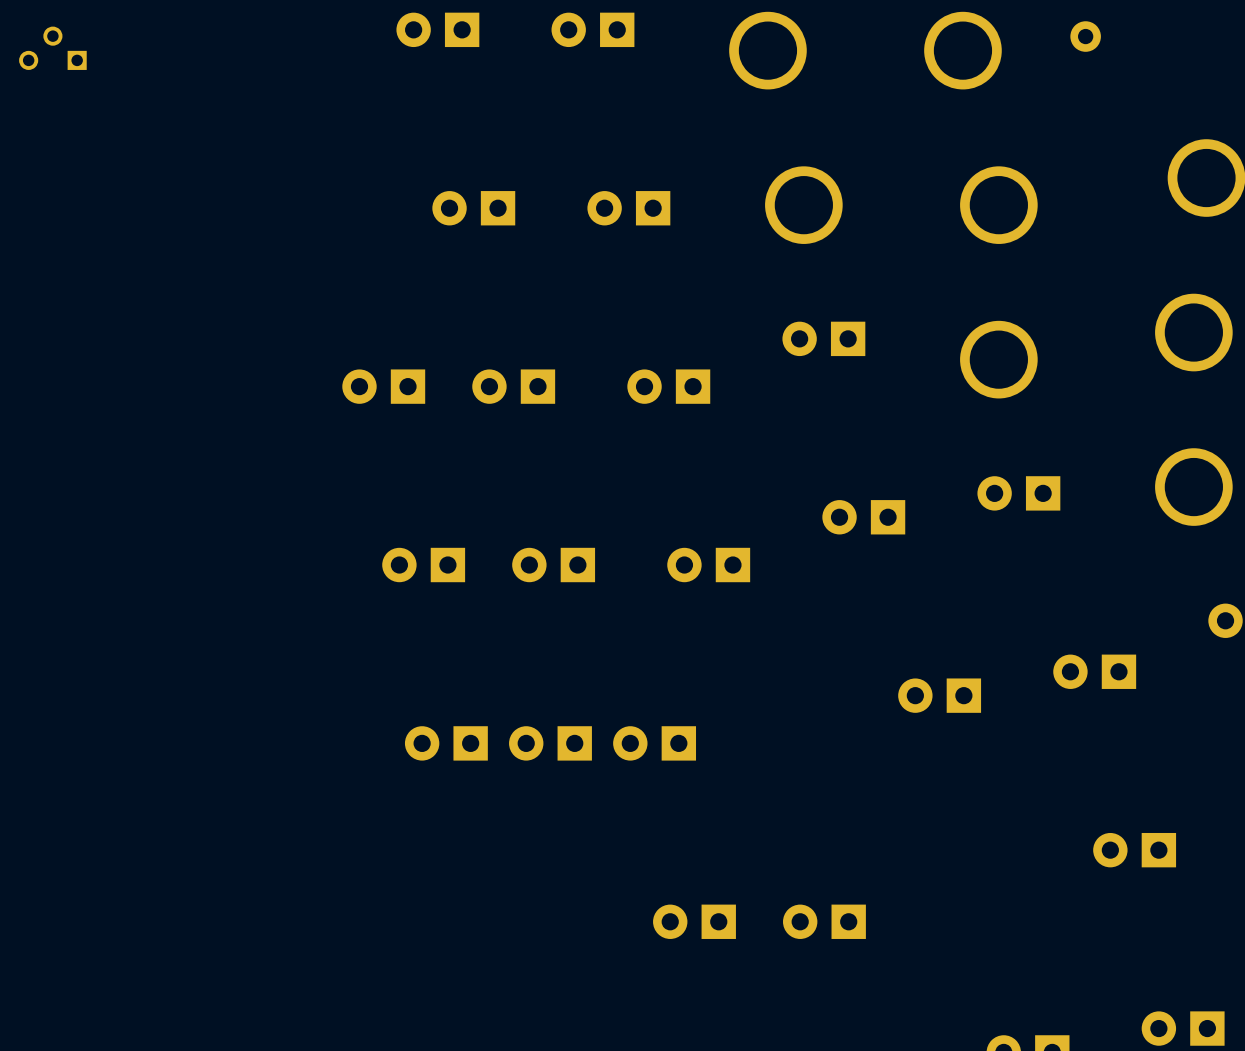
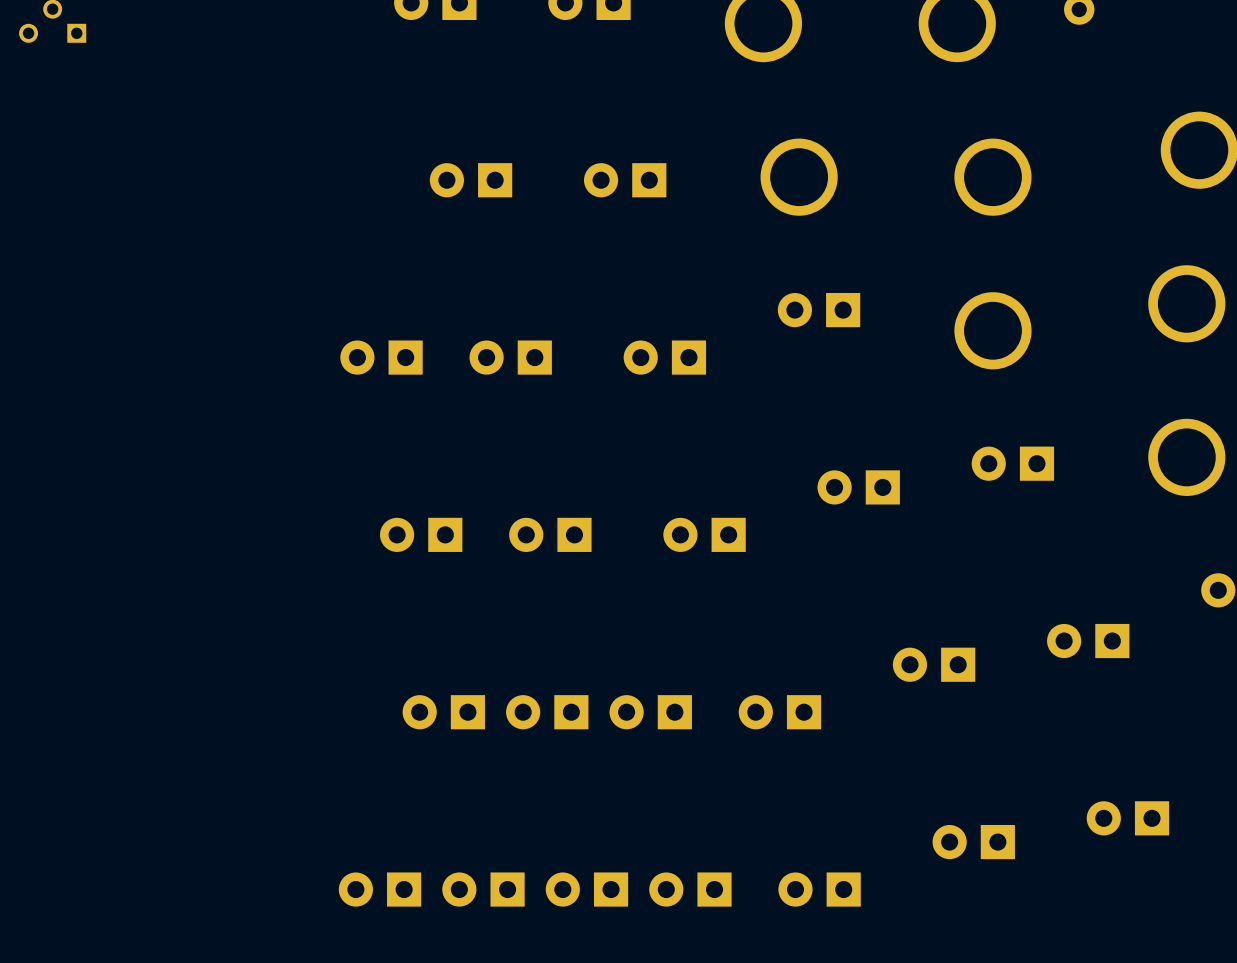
part: none -> (779, 712)
part: none -> (973, 842)
part: none -> (379, 889)
part: none -> (483, 889)
part: none -> (586, 889)

